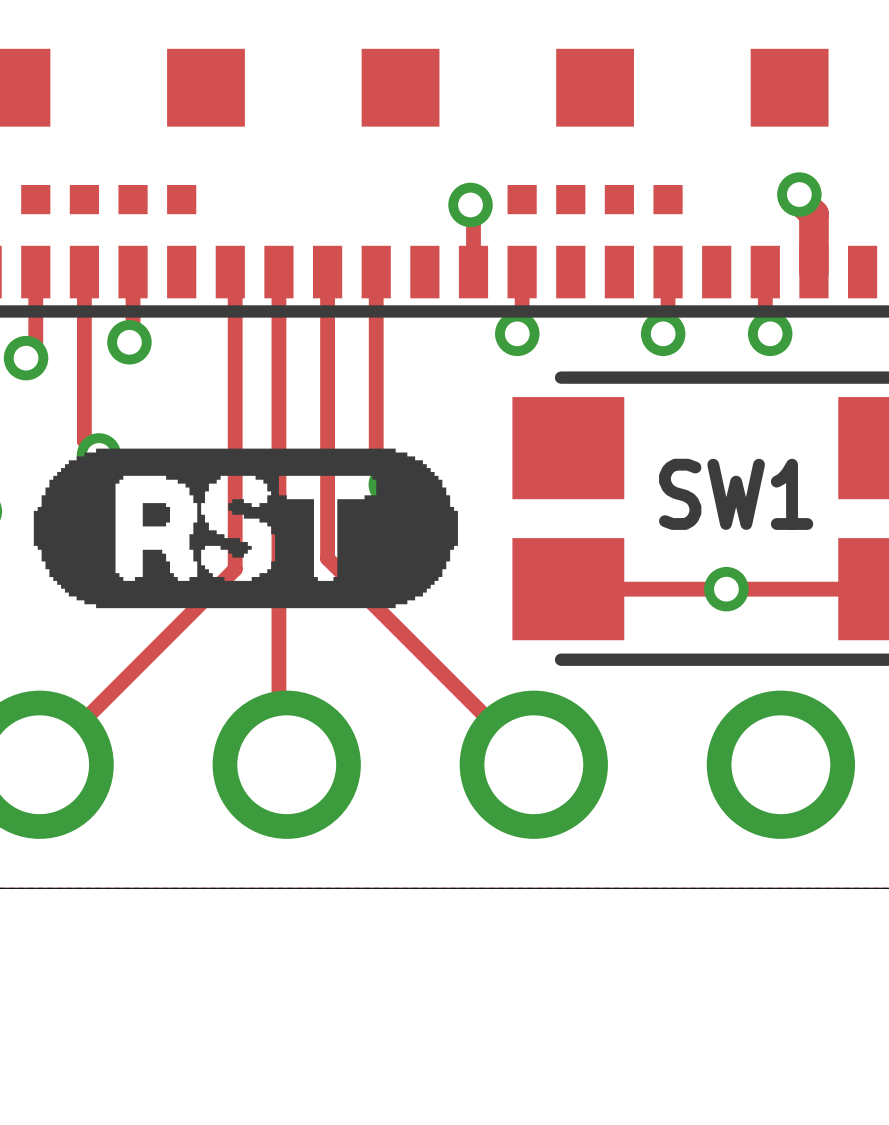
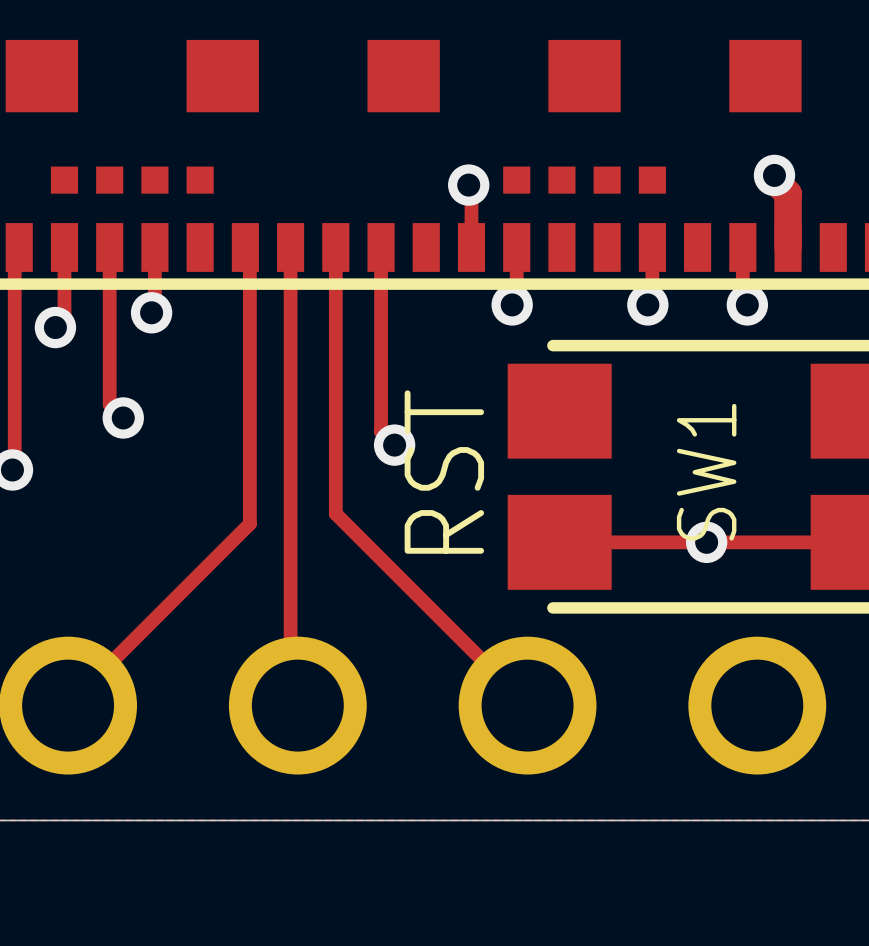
drawing: [33, 448, 458, 609] -> none
SW1 name rotation: 0° (736, 494) -> 90° counterclockwise (706, 472)
text: none -> RST (444, 472)

